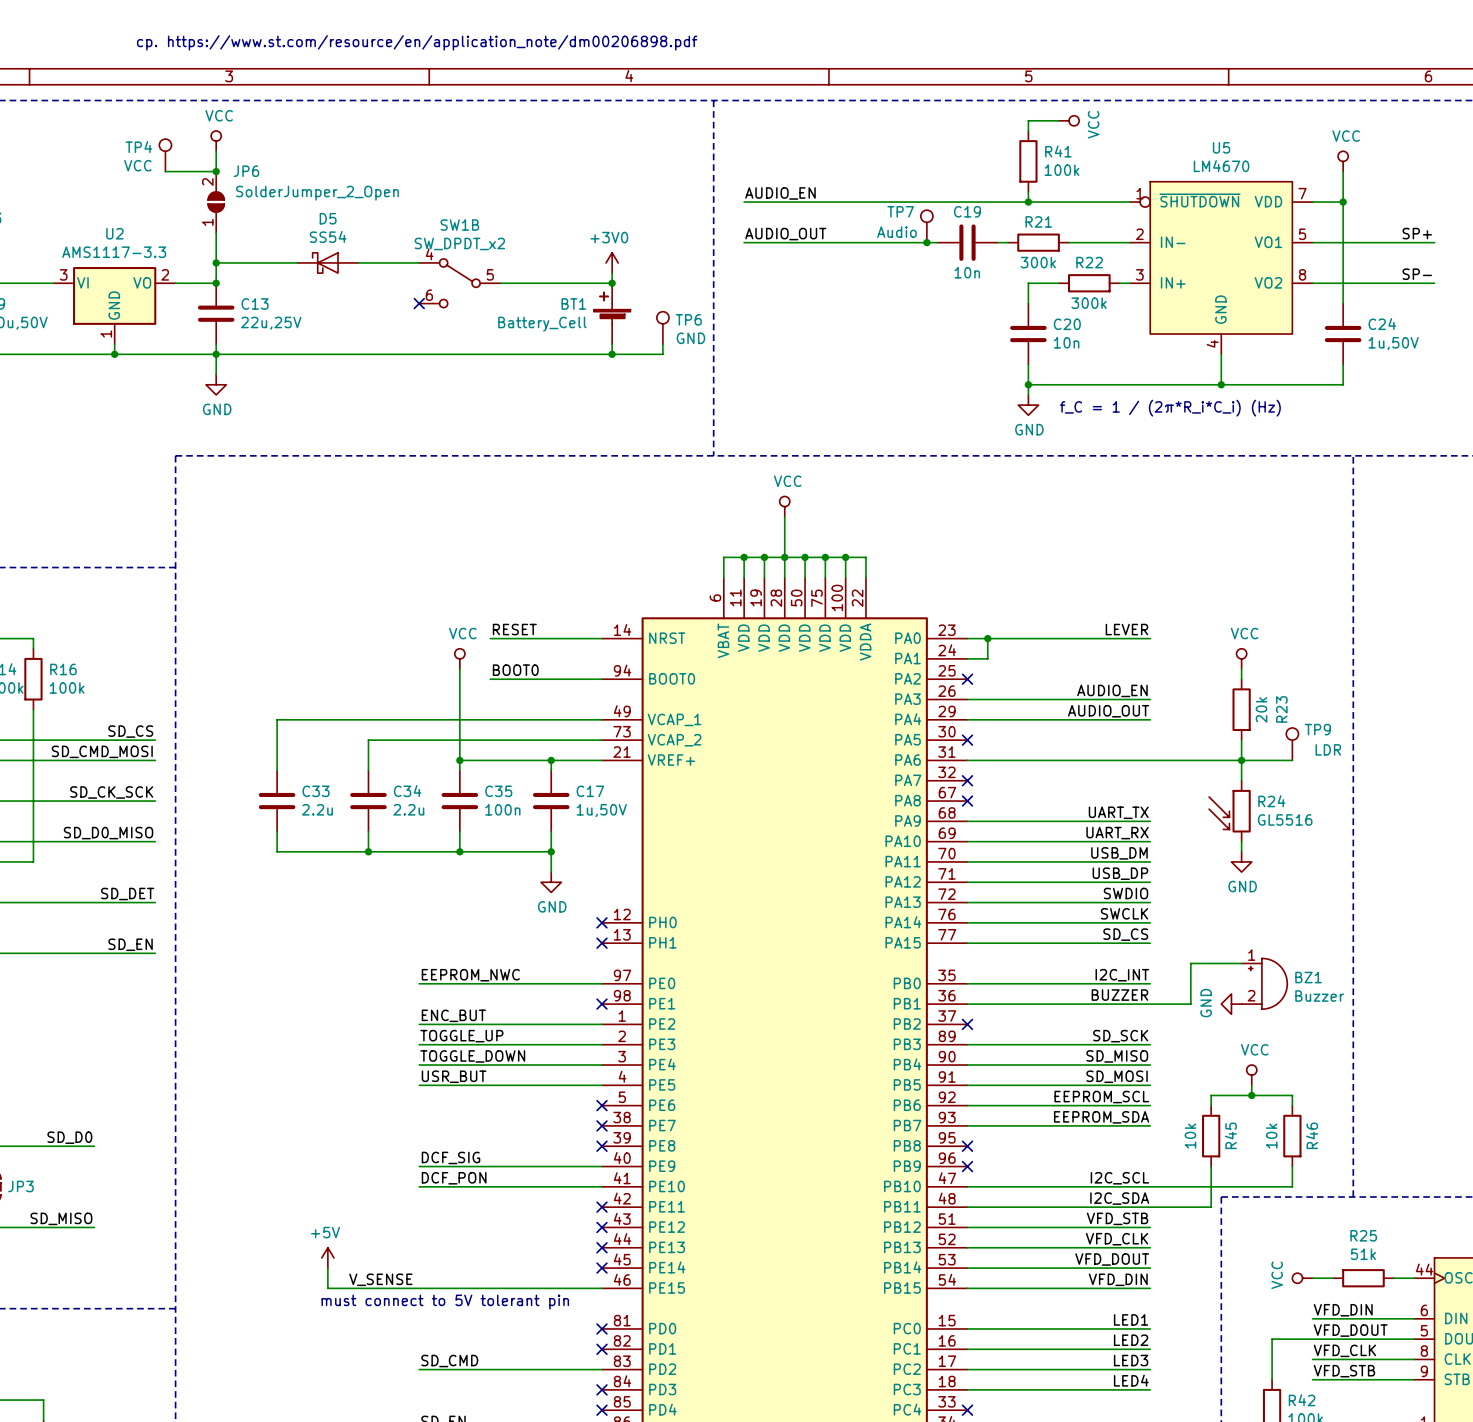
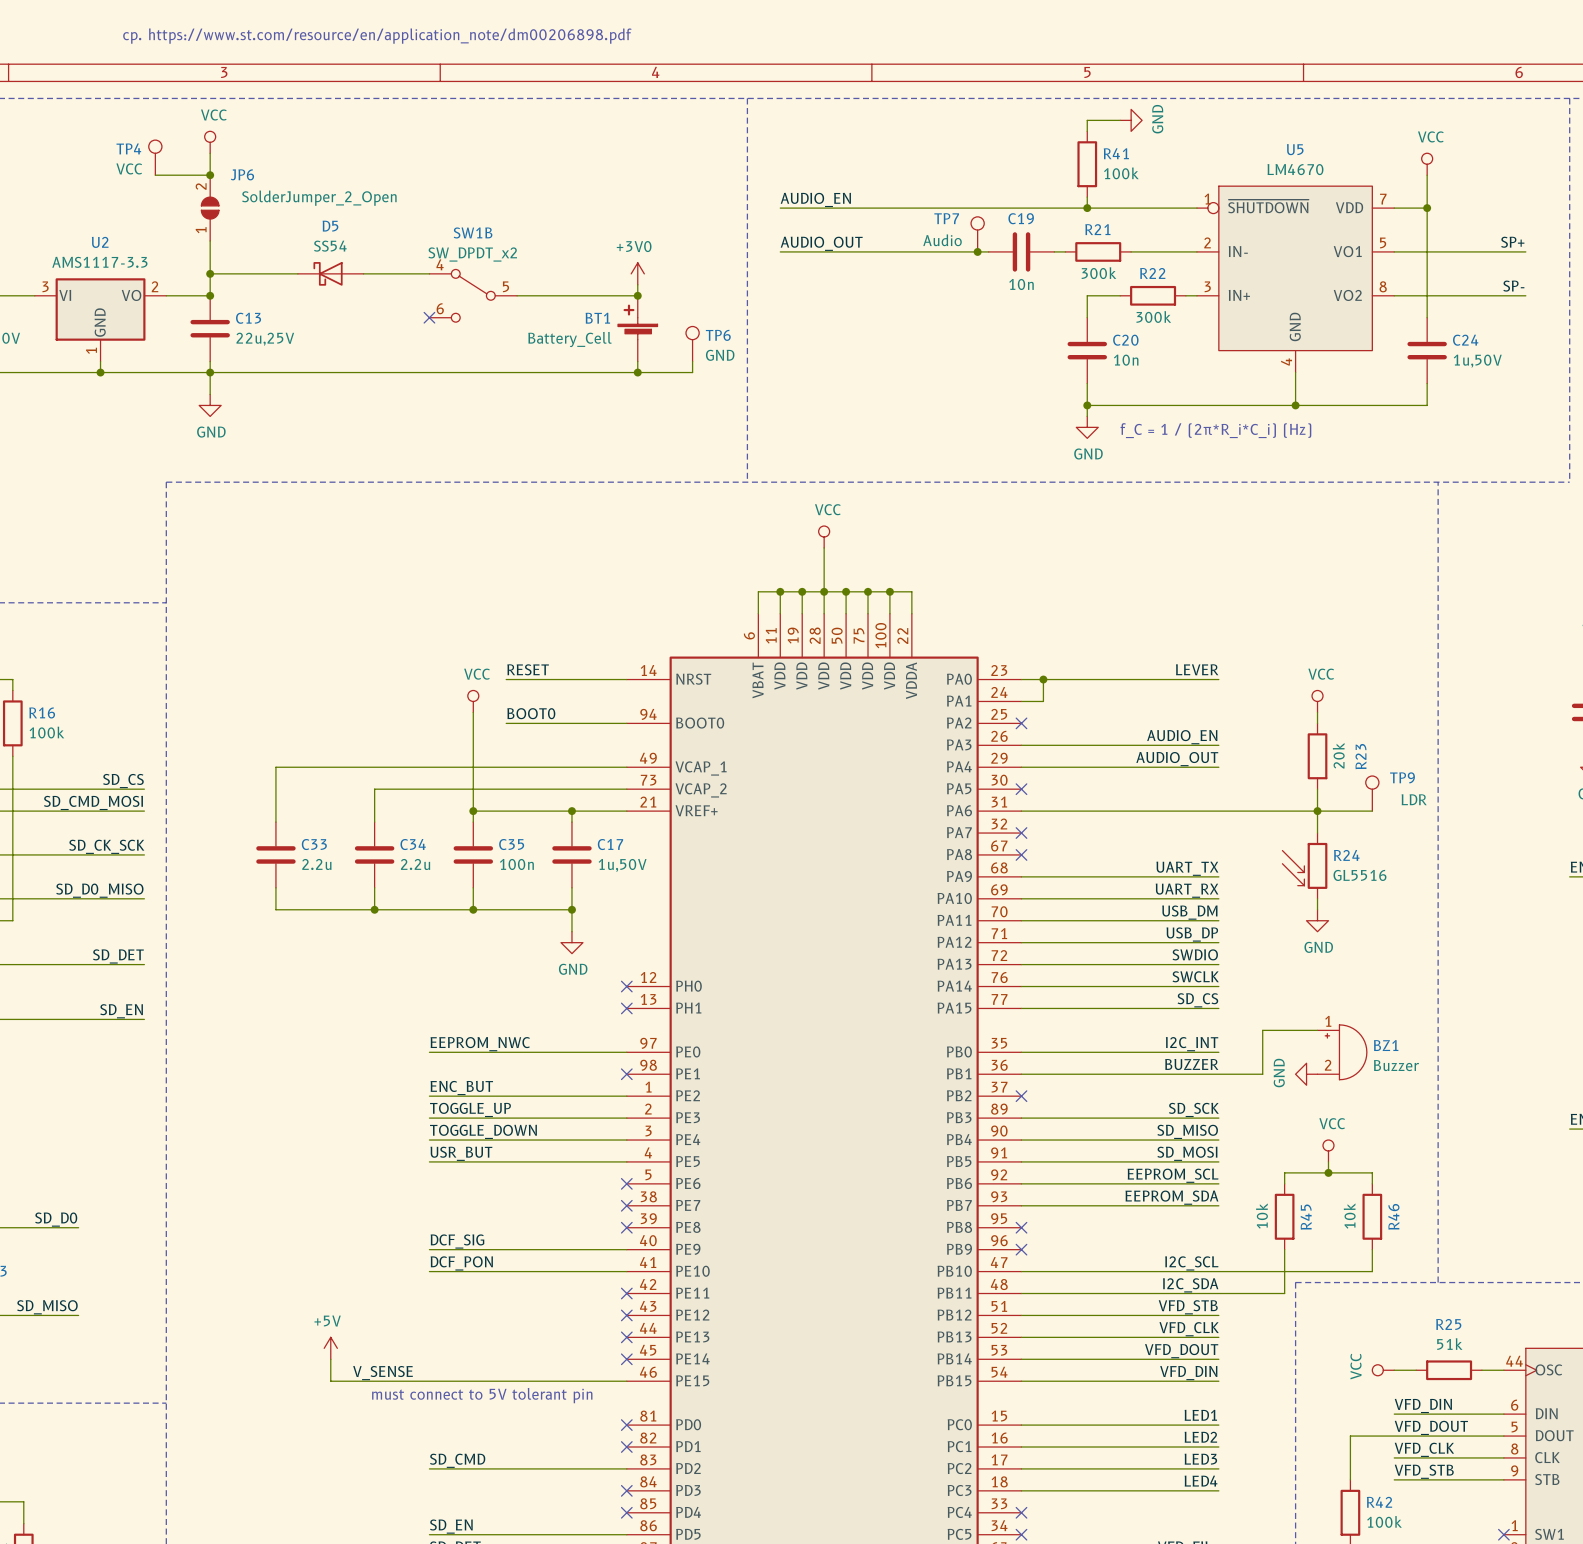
power symbol: VCC (1069, 120) -> GND (1131, 120)

